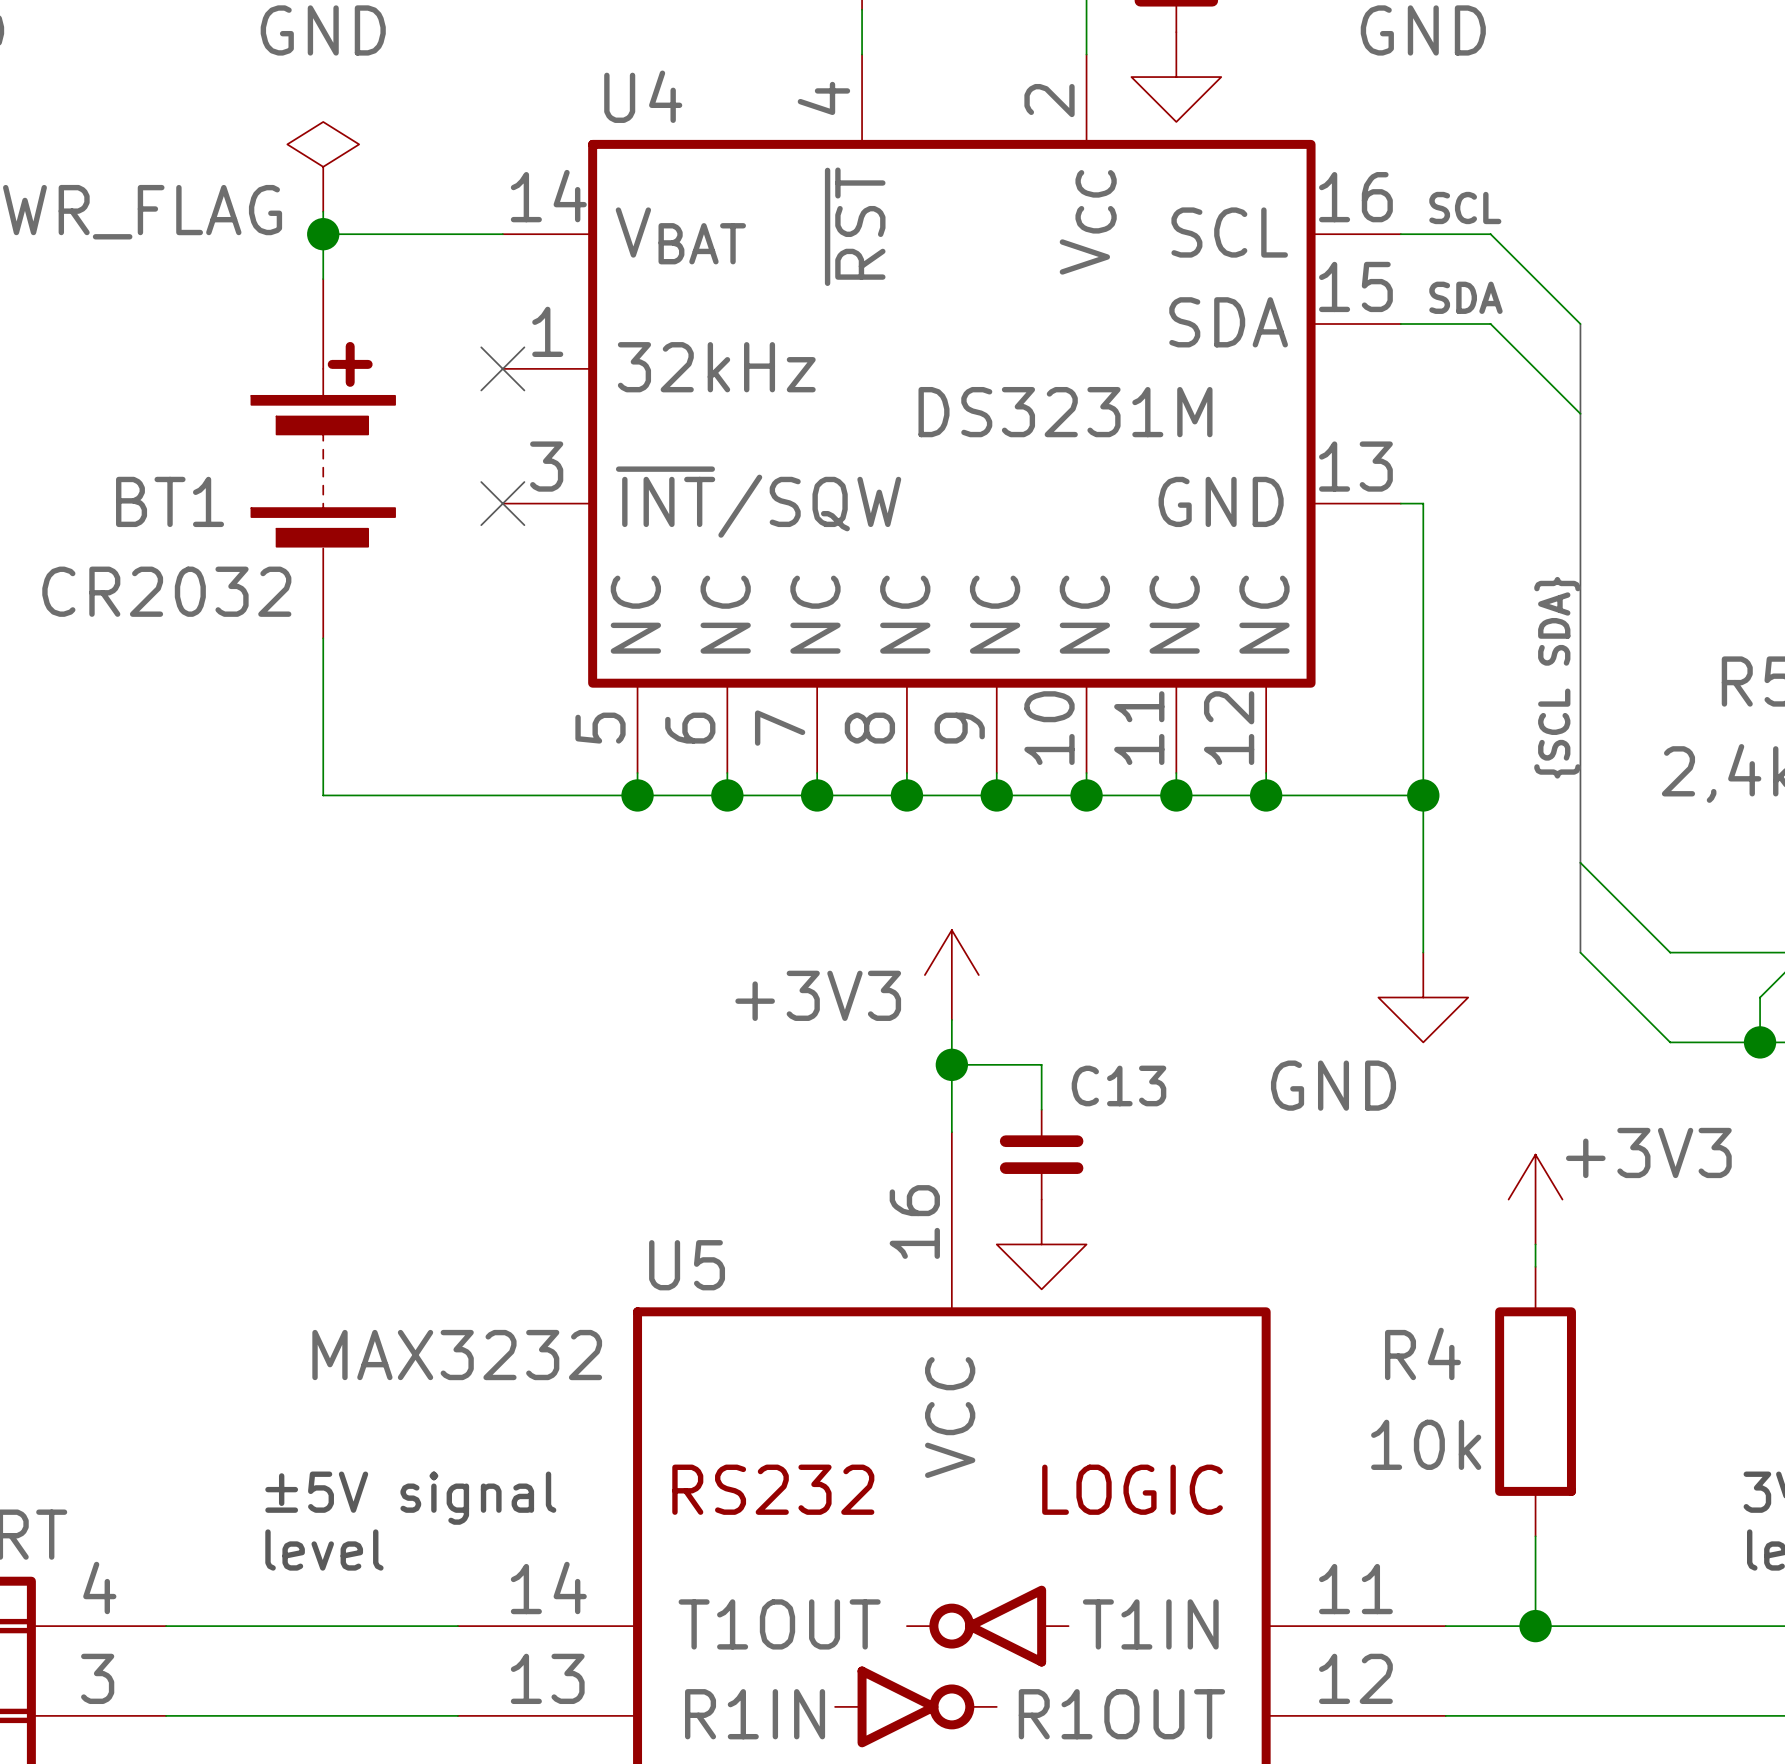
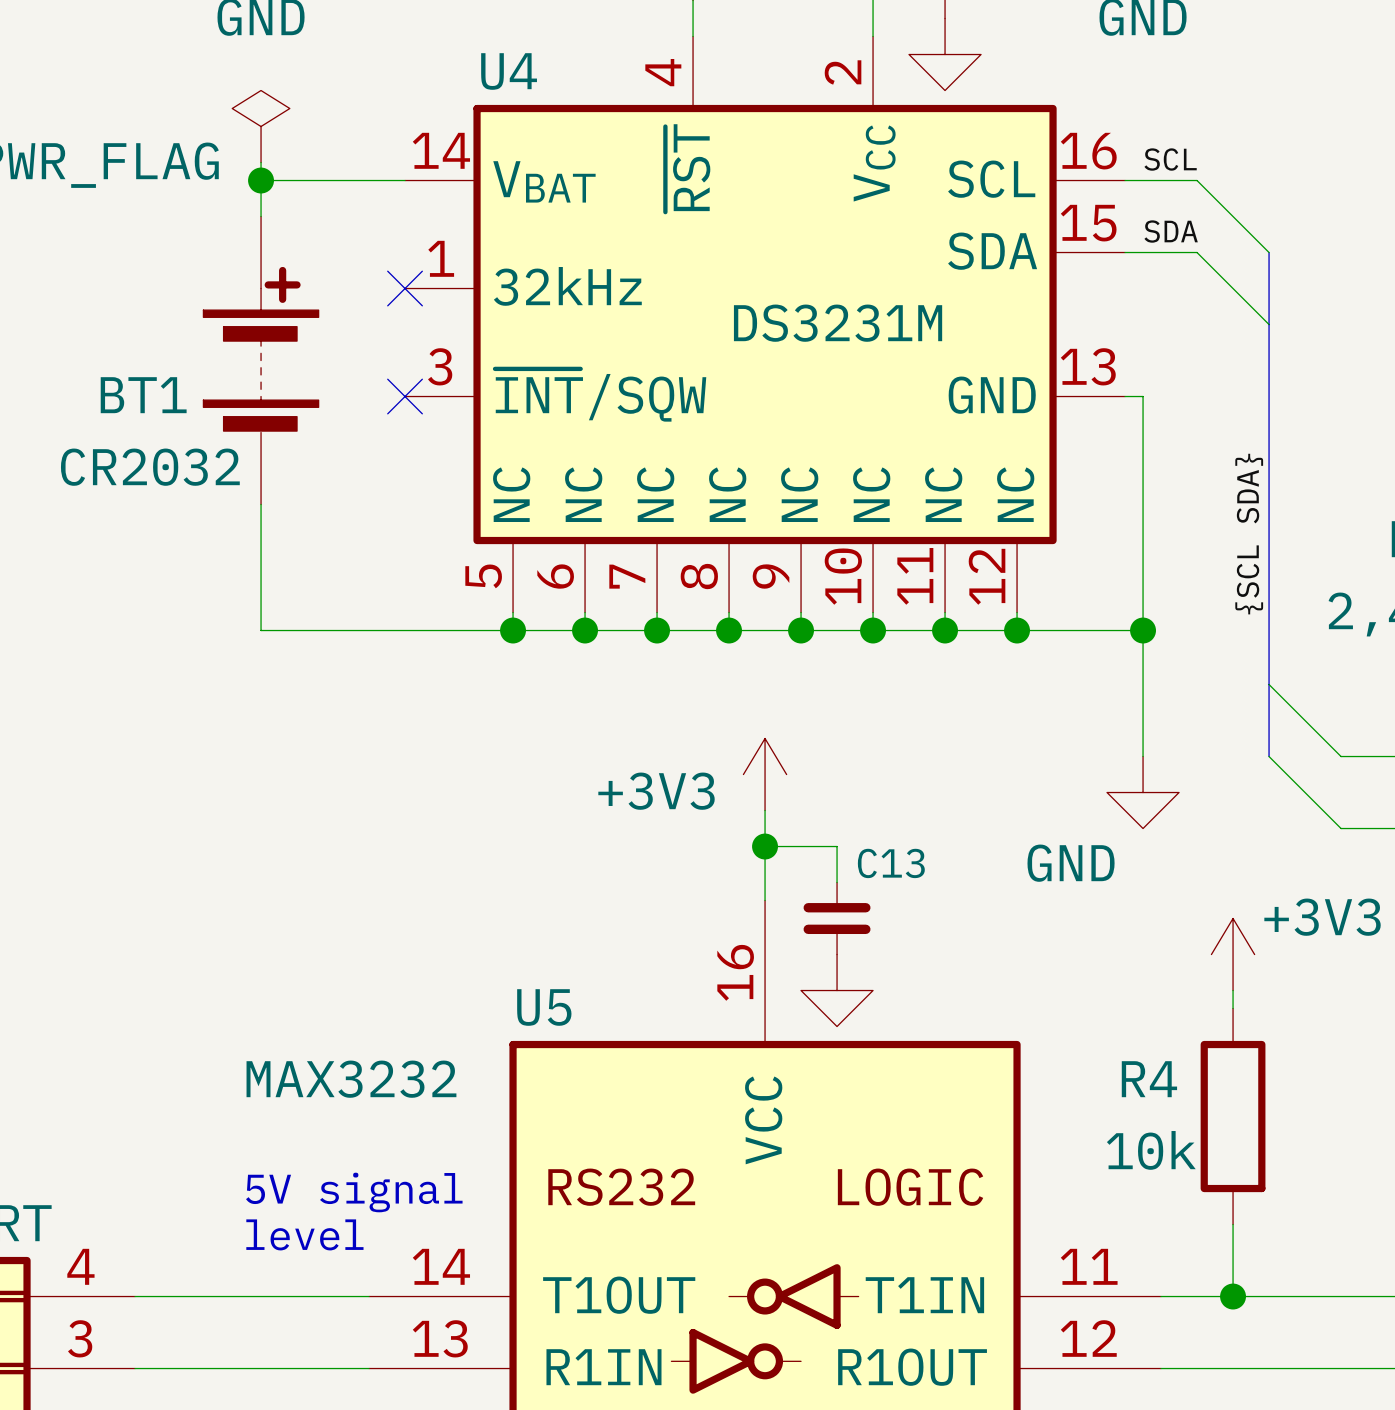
text: ±5V signal (410, 1498) -> 5V signal (354, 1192)
text position: level (324, 1550) -> level (304, 1234)

